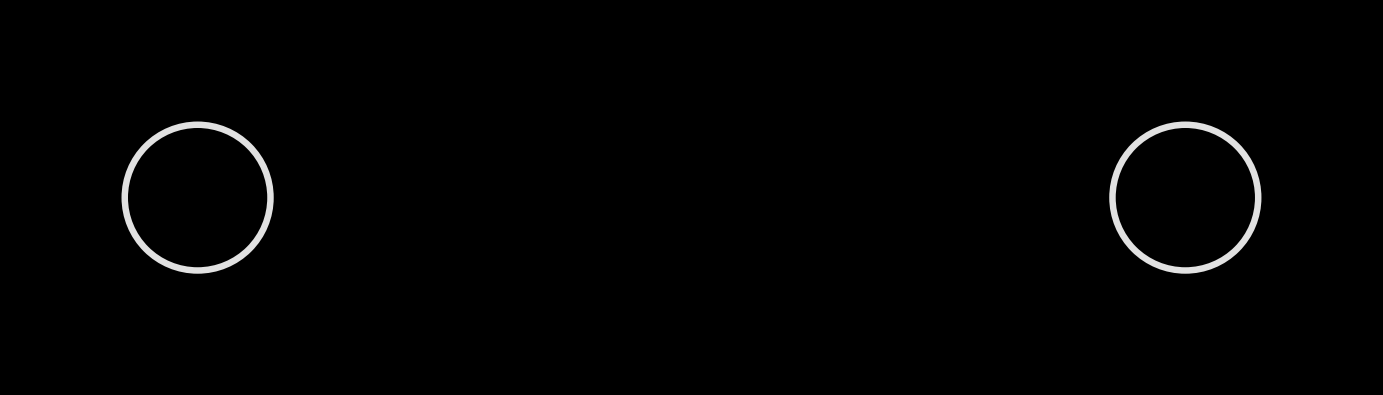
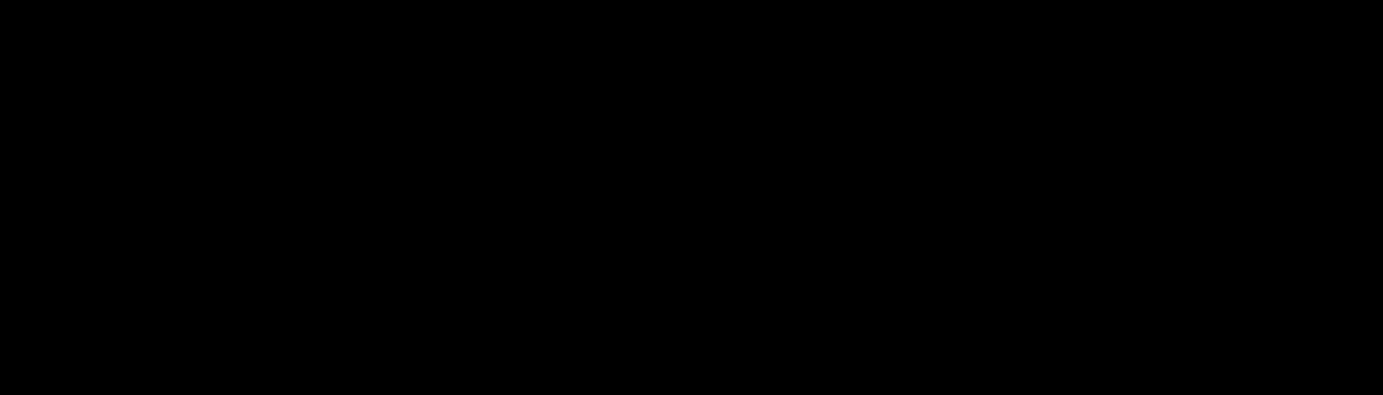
drawing: [121, 121, 274, 274] -> none
drawing: [1109, 121, 1262, 274] -> none

